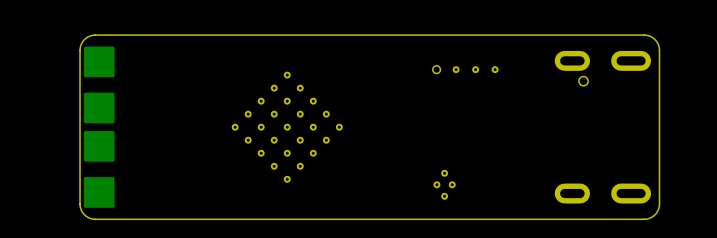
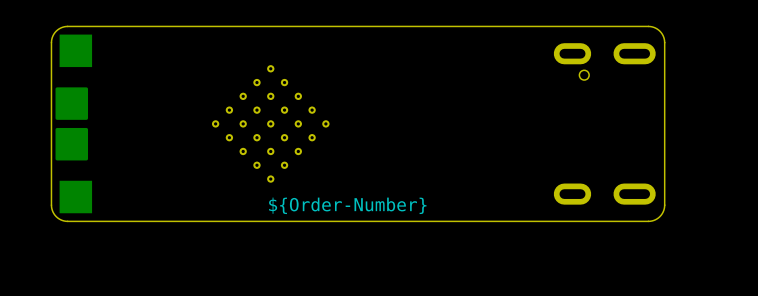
part footprint: [83, 46, 115, 78] -> [59, 34, 93, 68]
part: (465, 69) -> none
part footprint: [83, 177, 115, 208] -> [59, 180, 93, 214]
part: (444, 184) -> none
drawing: none -> [269, 197, 427, 215]

